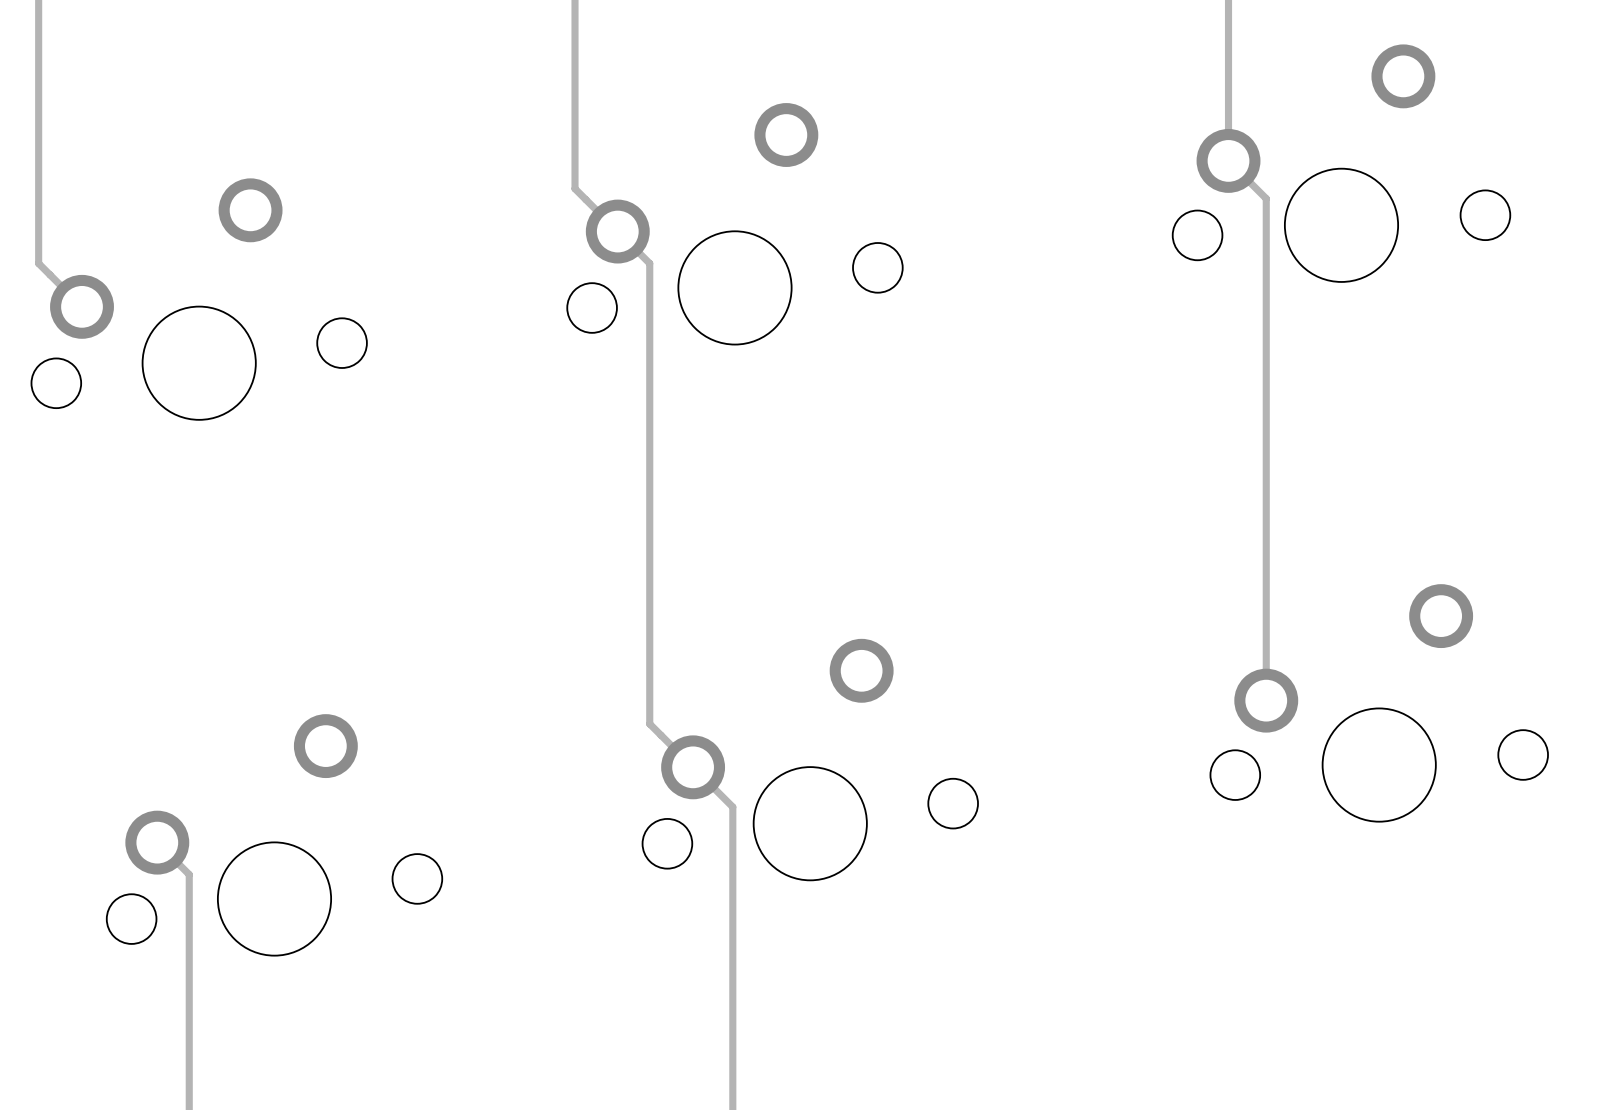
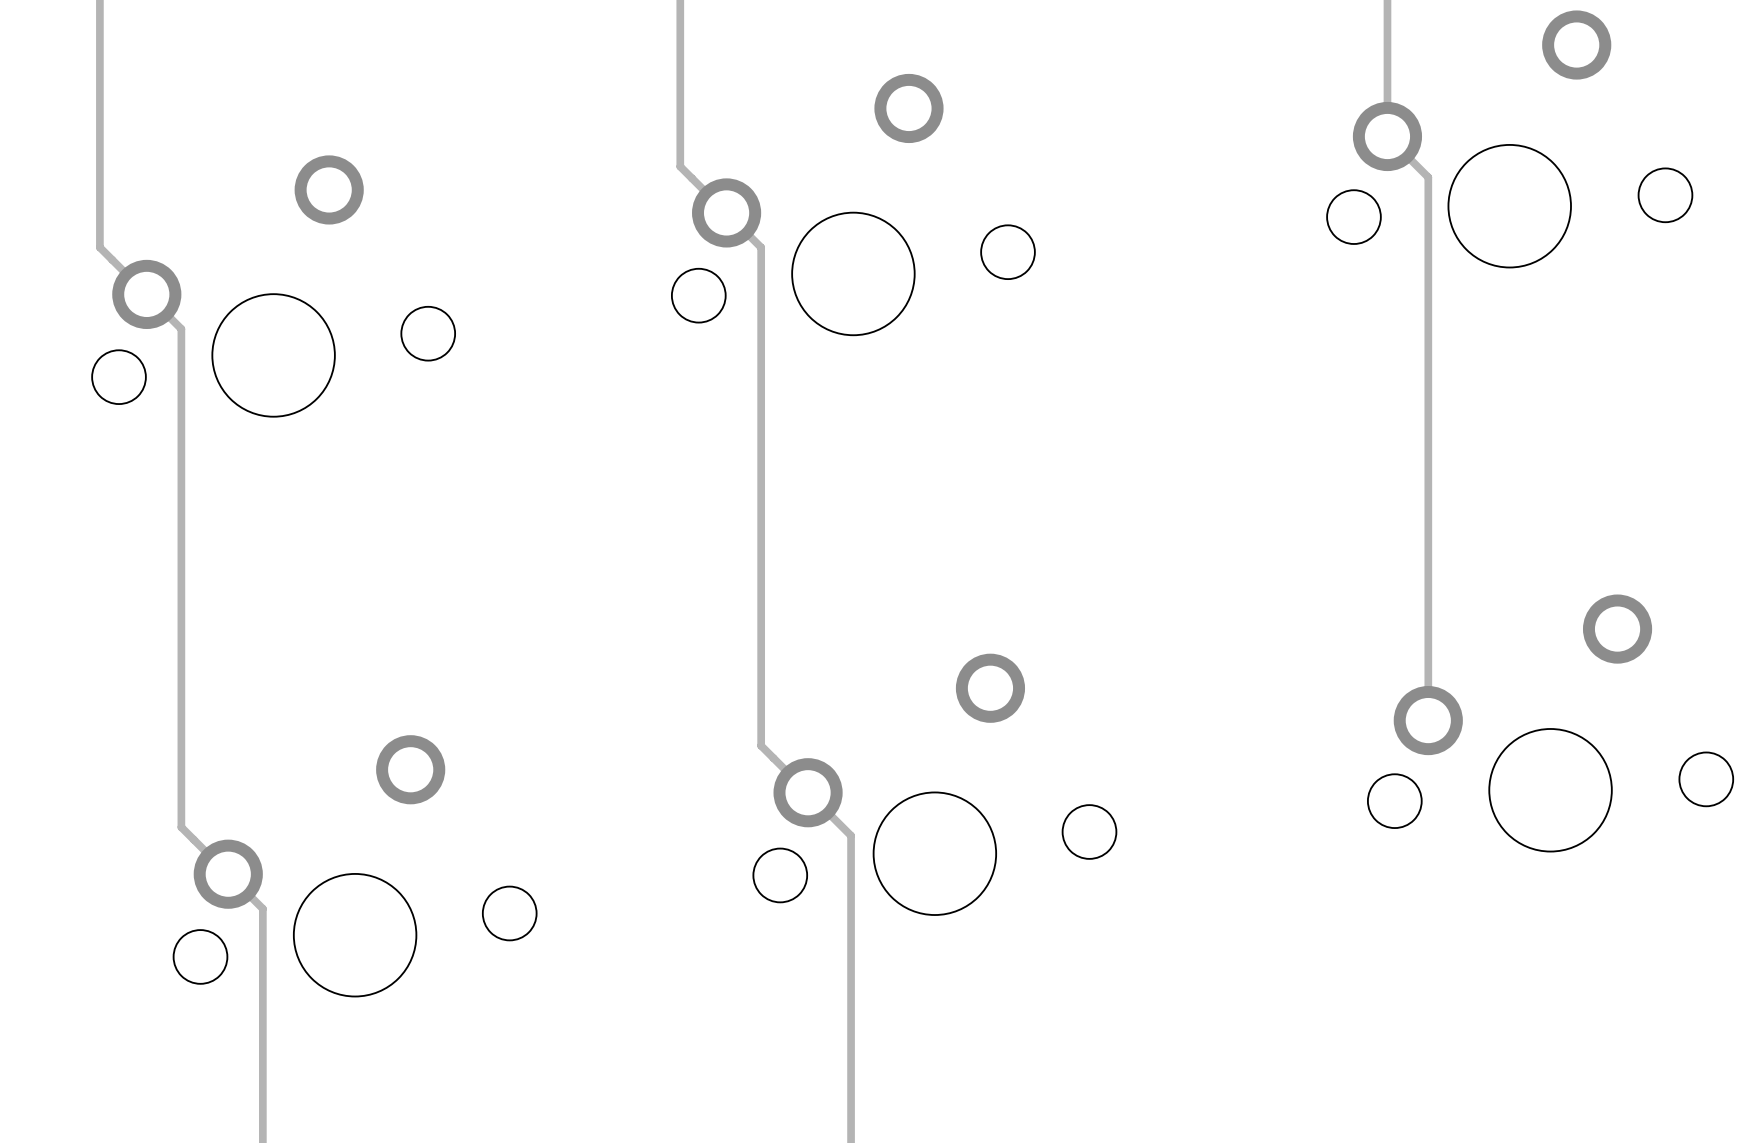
track: none -> (146, 294) (181, 329) (181, 827) (228, 874)

